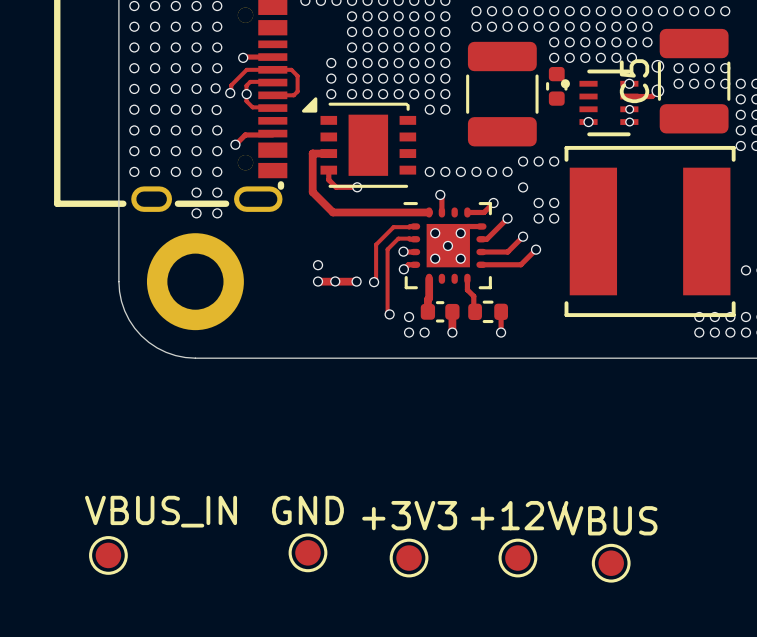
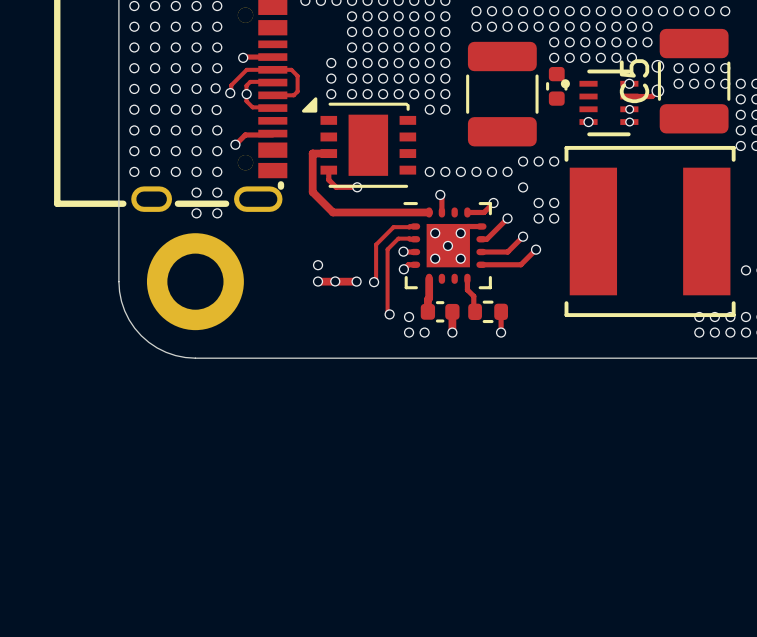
part: (307, 552) -> none
part: (108, 555) -> none
part: (409, 558) -> none
part: (517, 558) -> none
part: (611, 563) -> none

